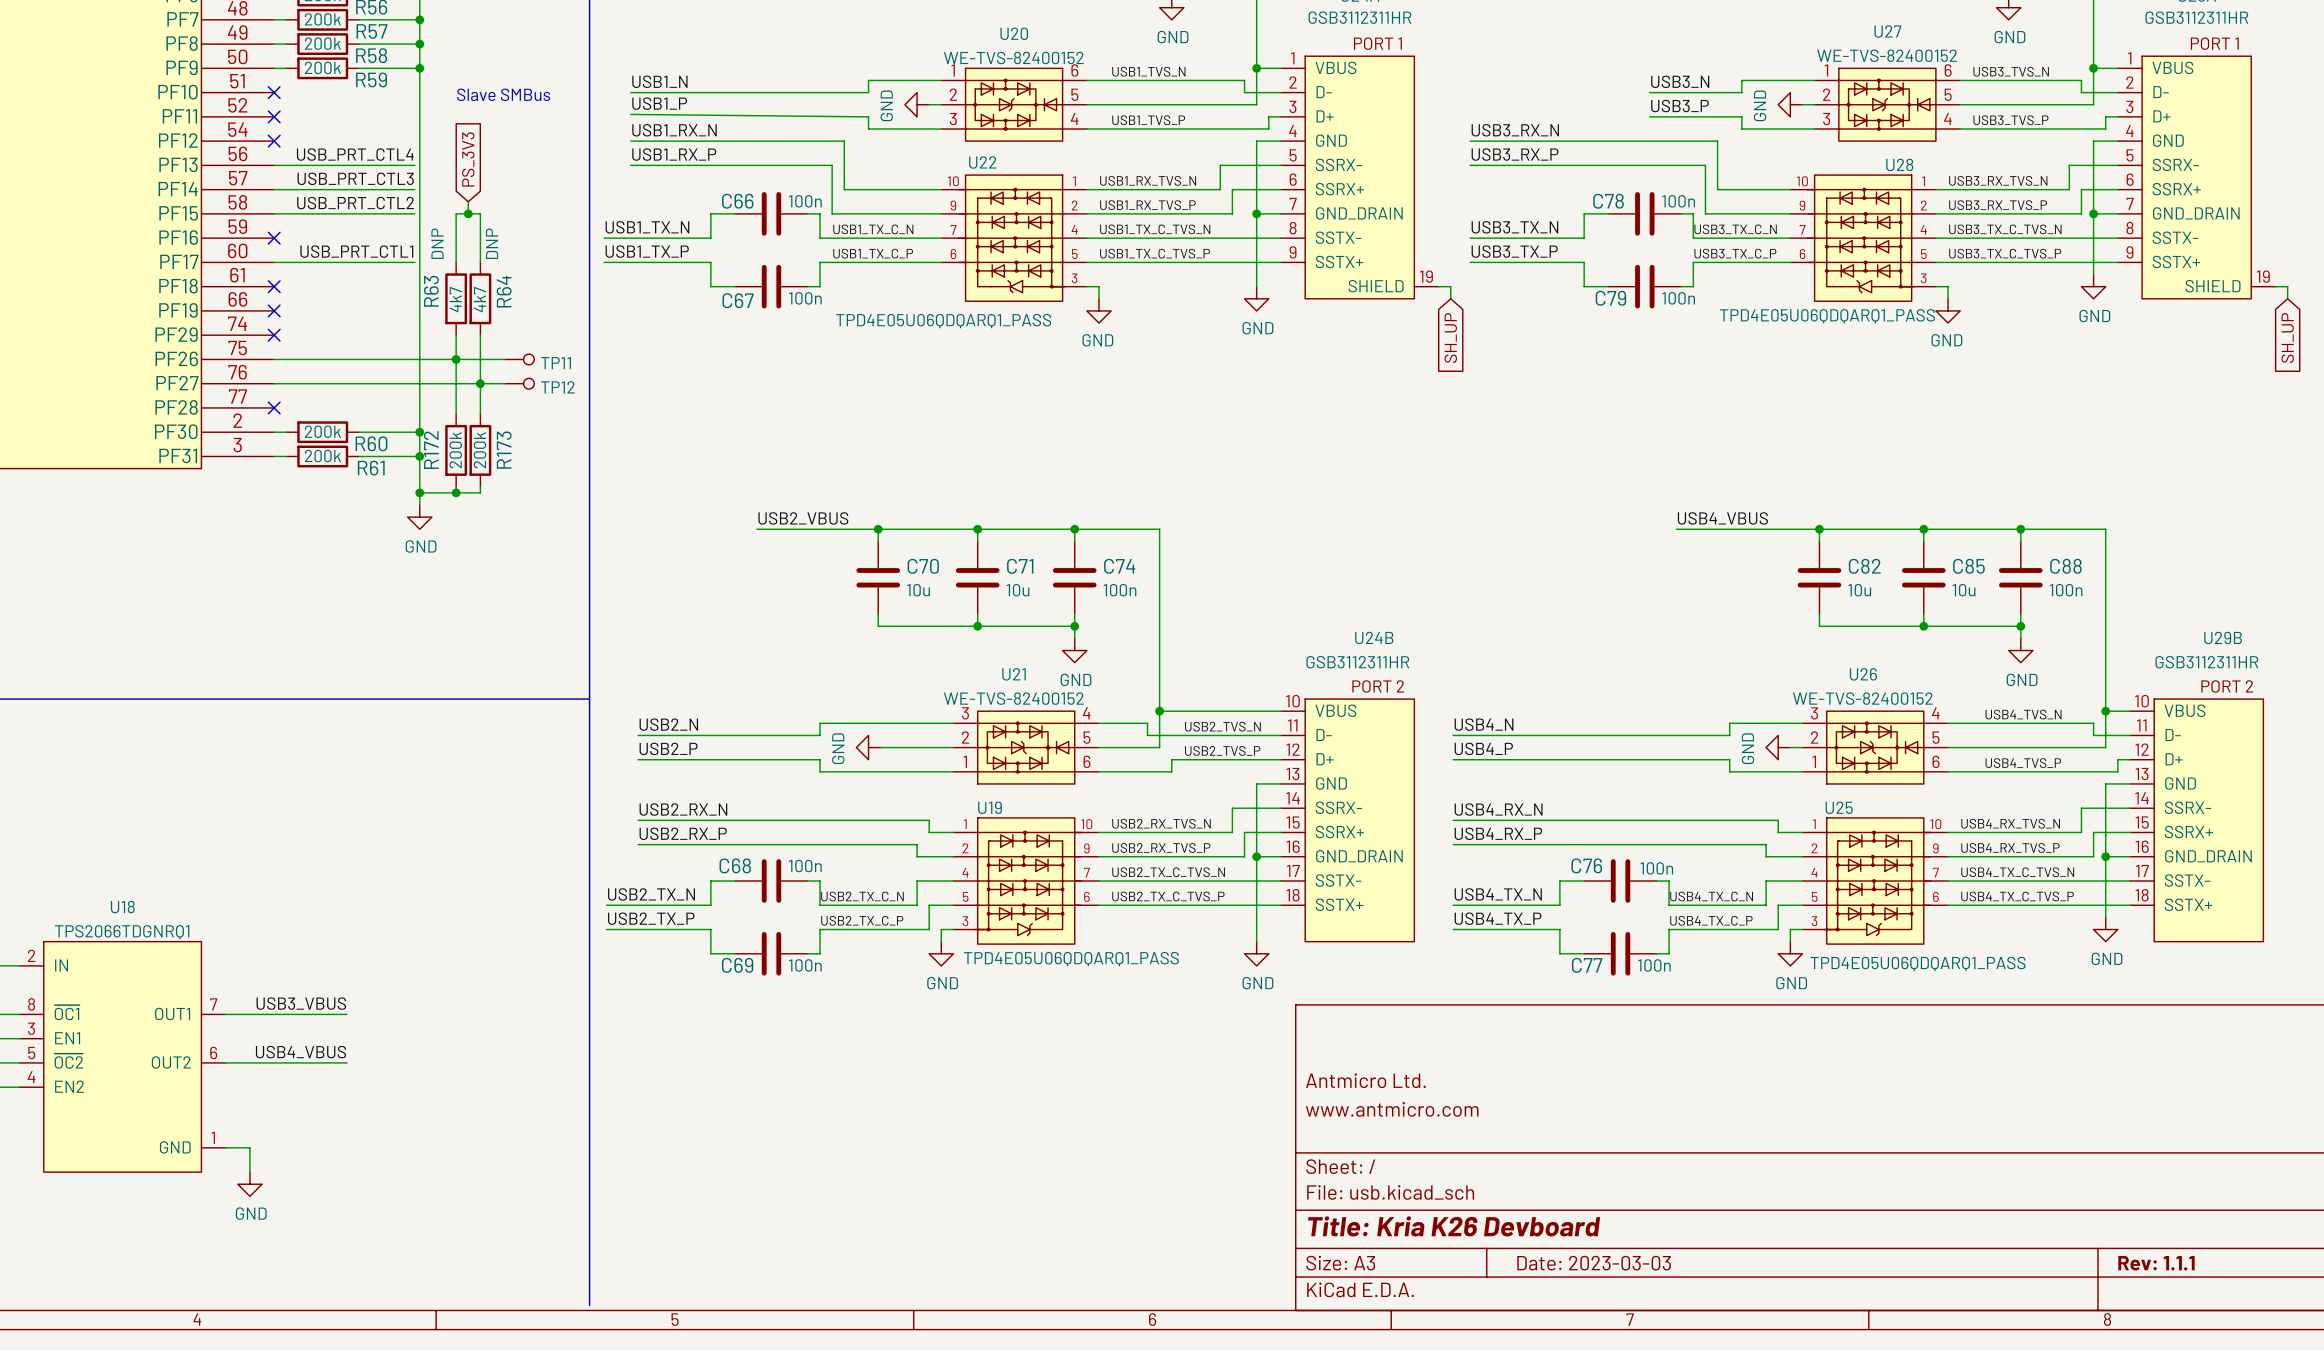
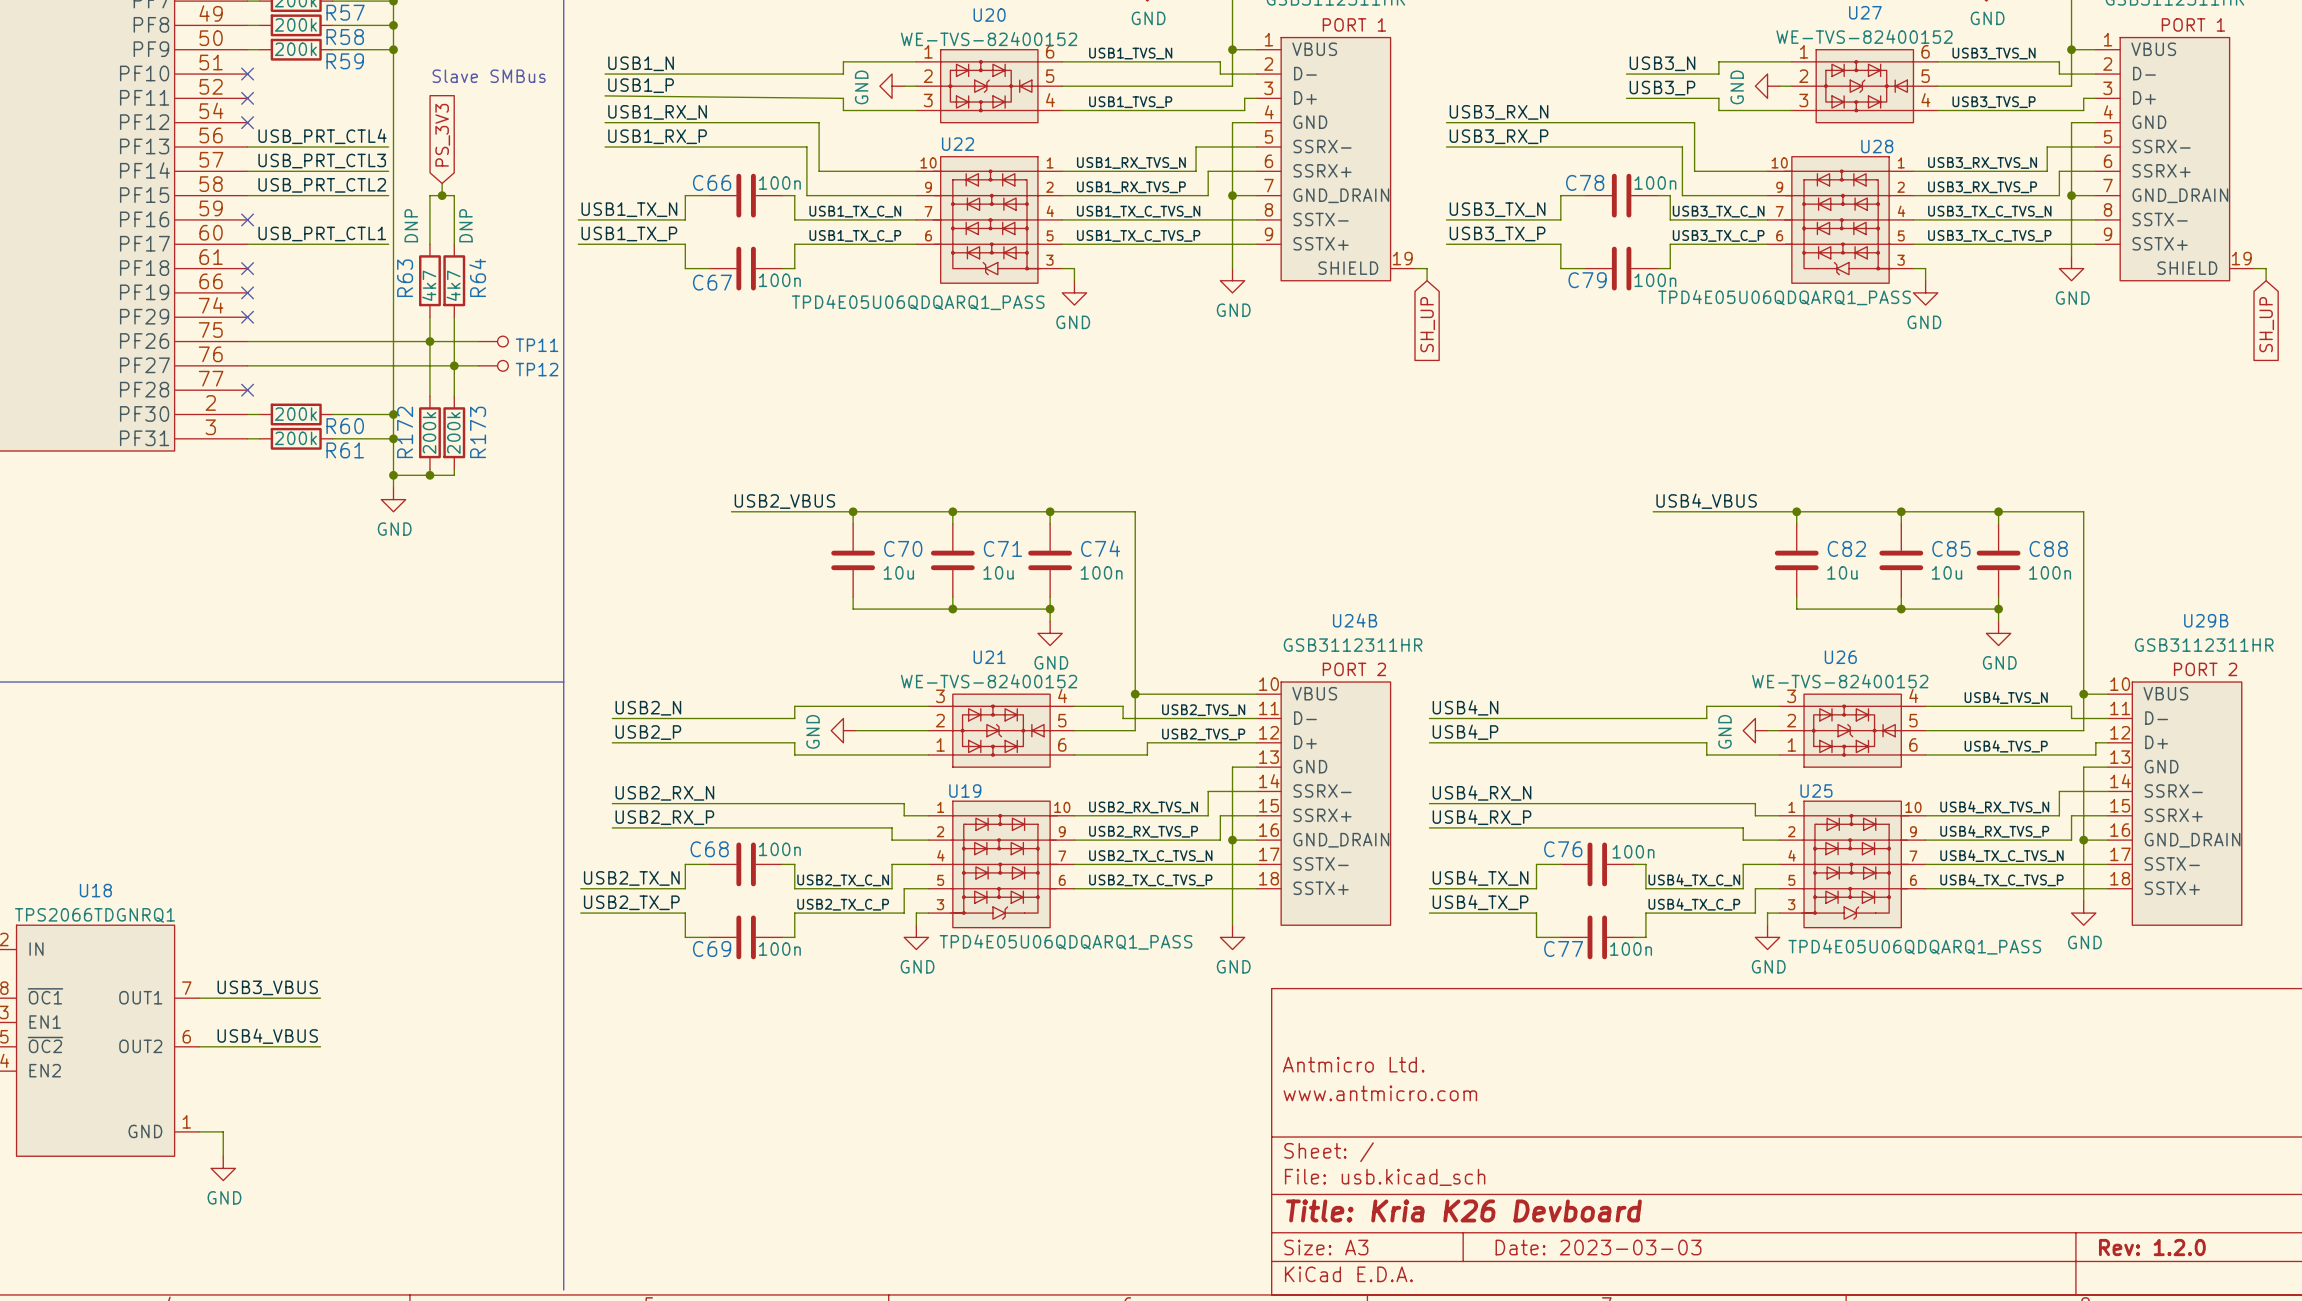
title block: Rev: 1.1.1 (2156, 1263) -> Rev: 1.2.0 (2152, 1247)

